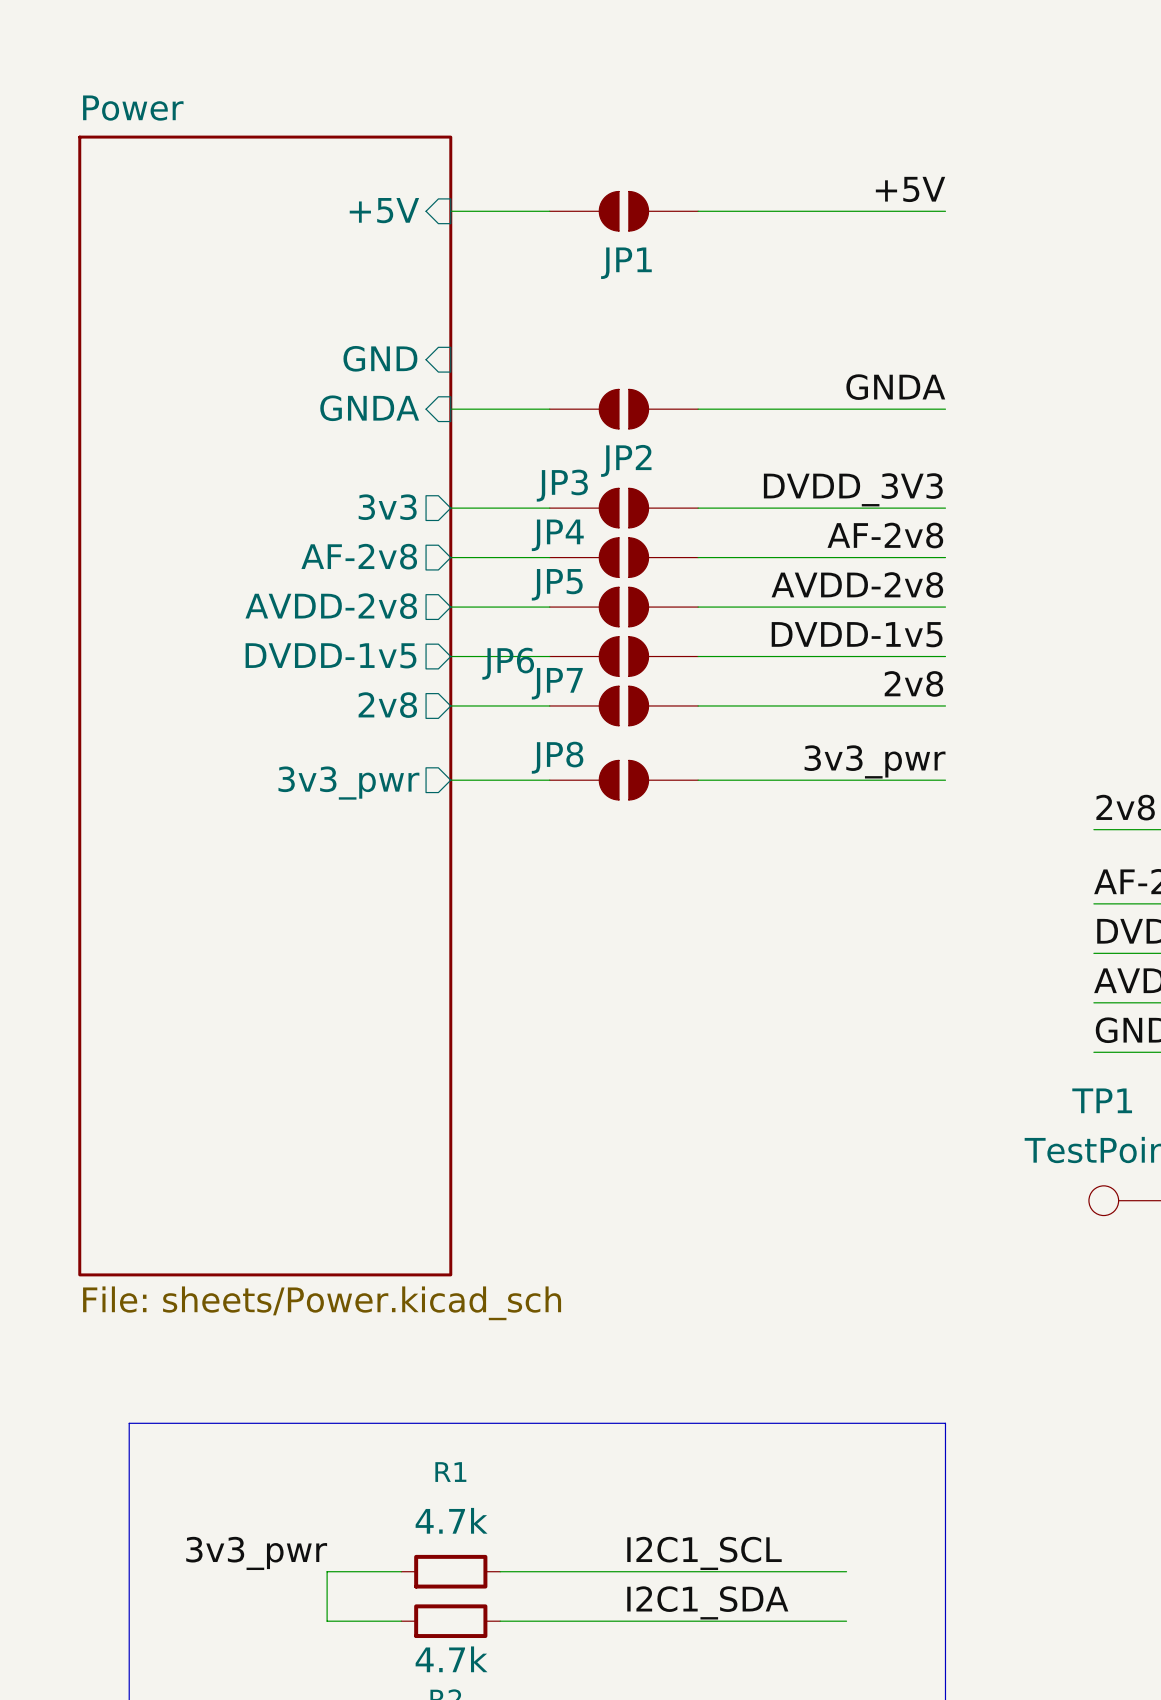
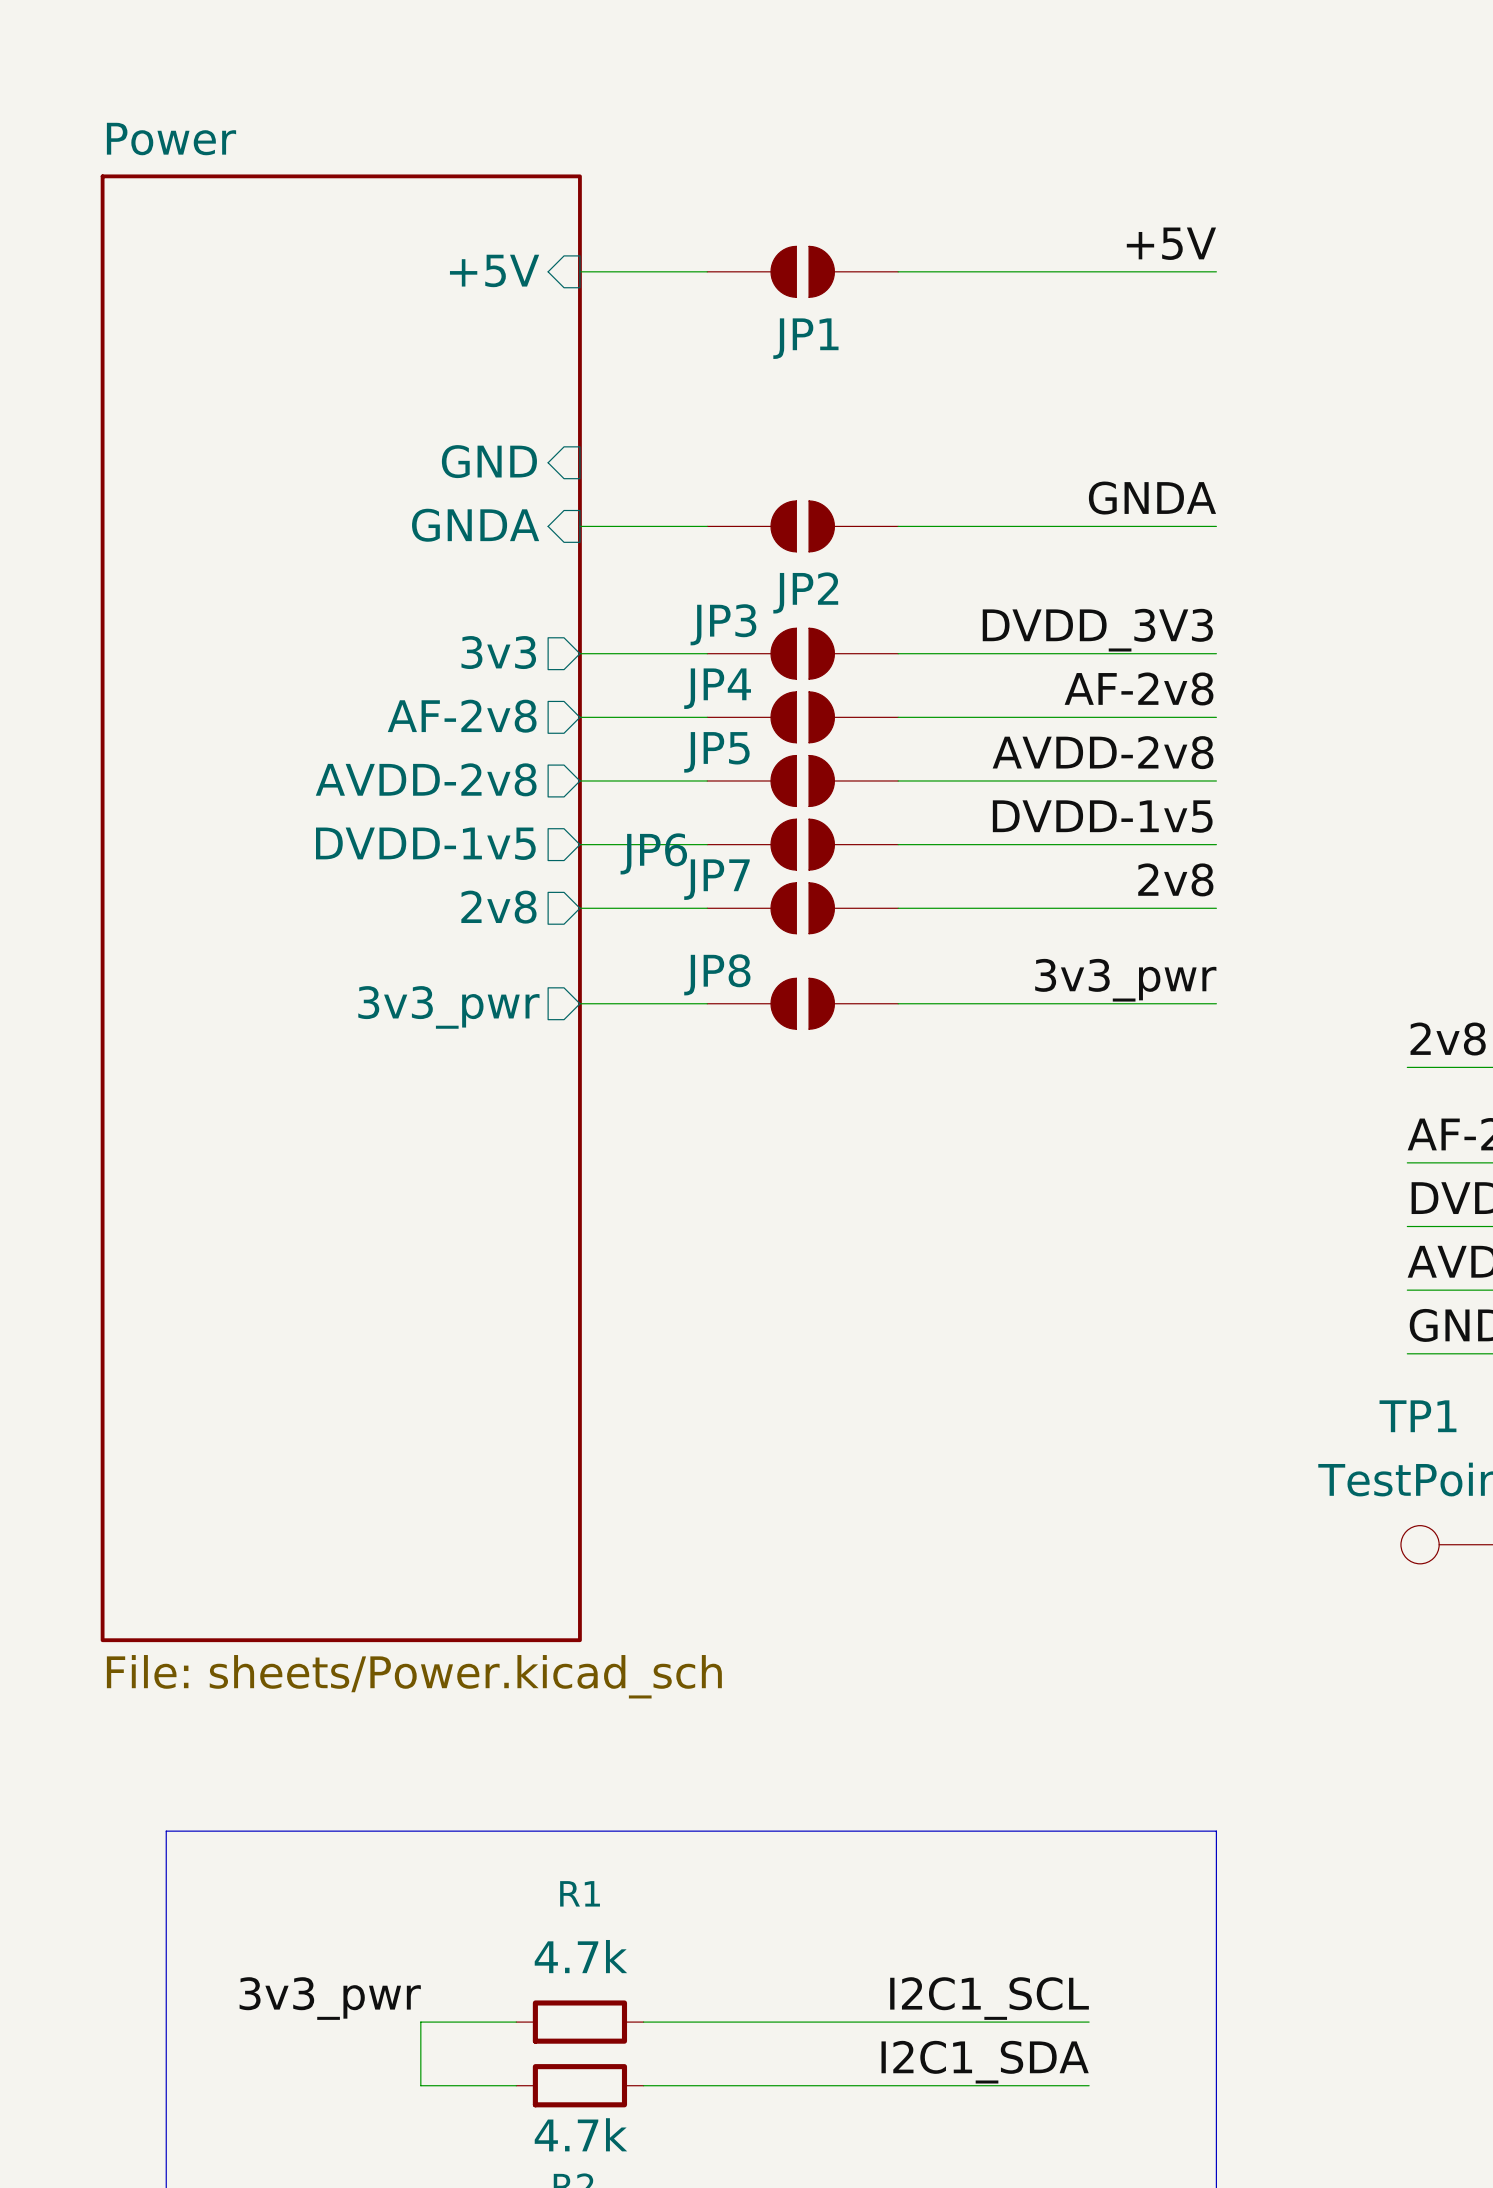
label position: I2C1_SCL (704, 1553) -> I2C1_SCL (989, 1998)
label position: I2C1_SDA (707, 1602) -> I2C1_SDA (985, 2062)

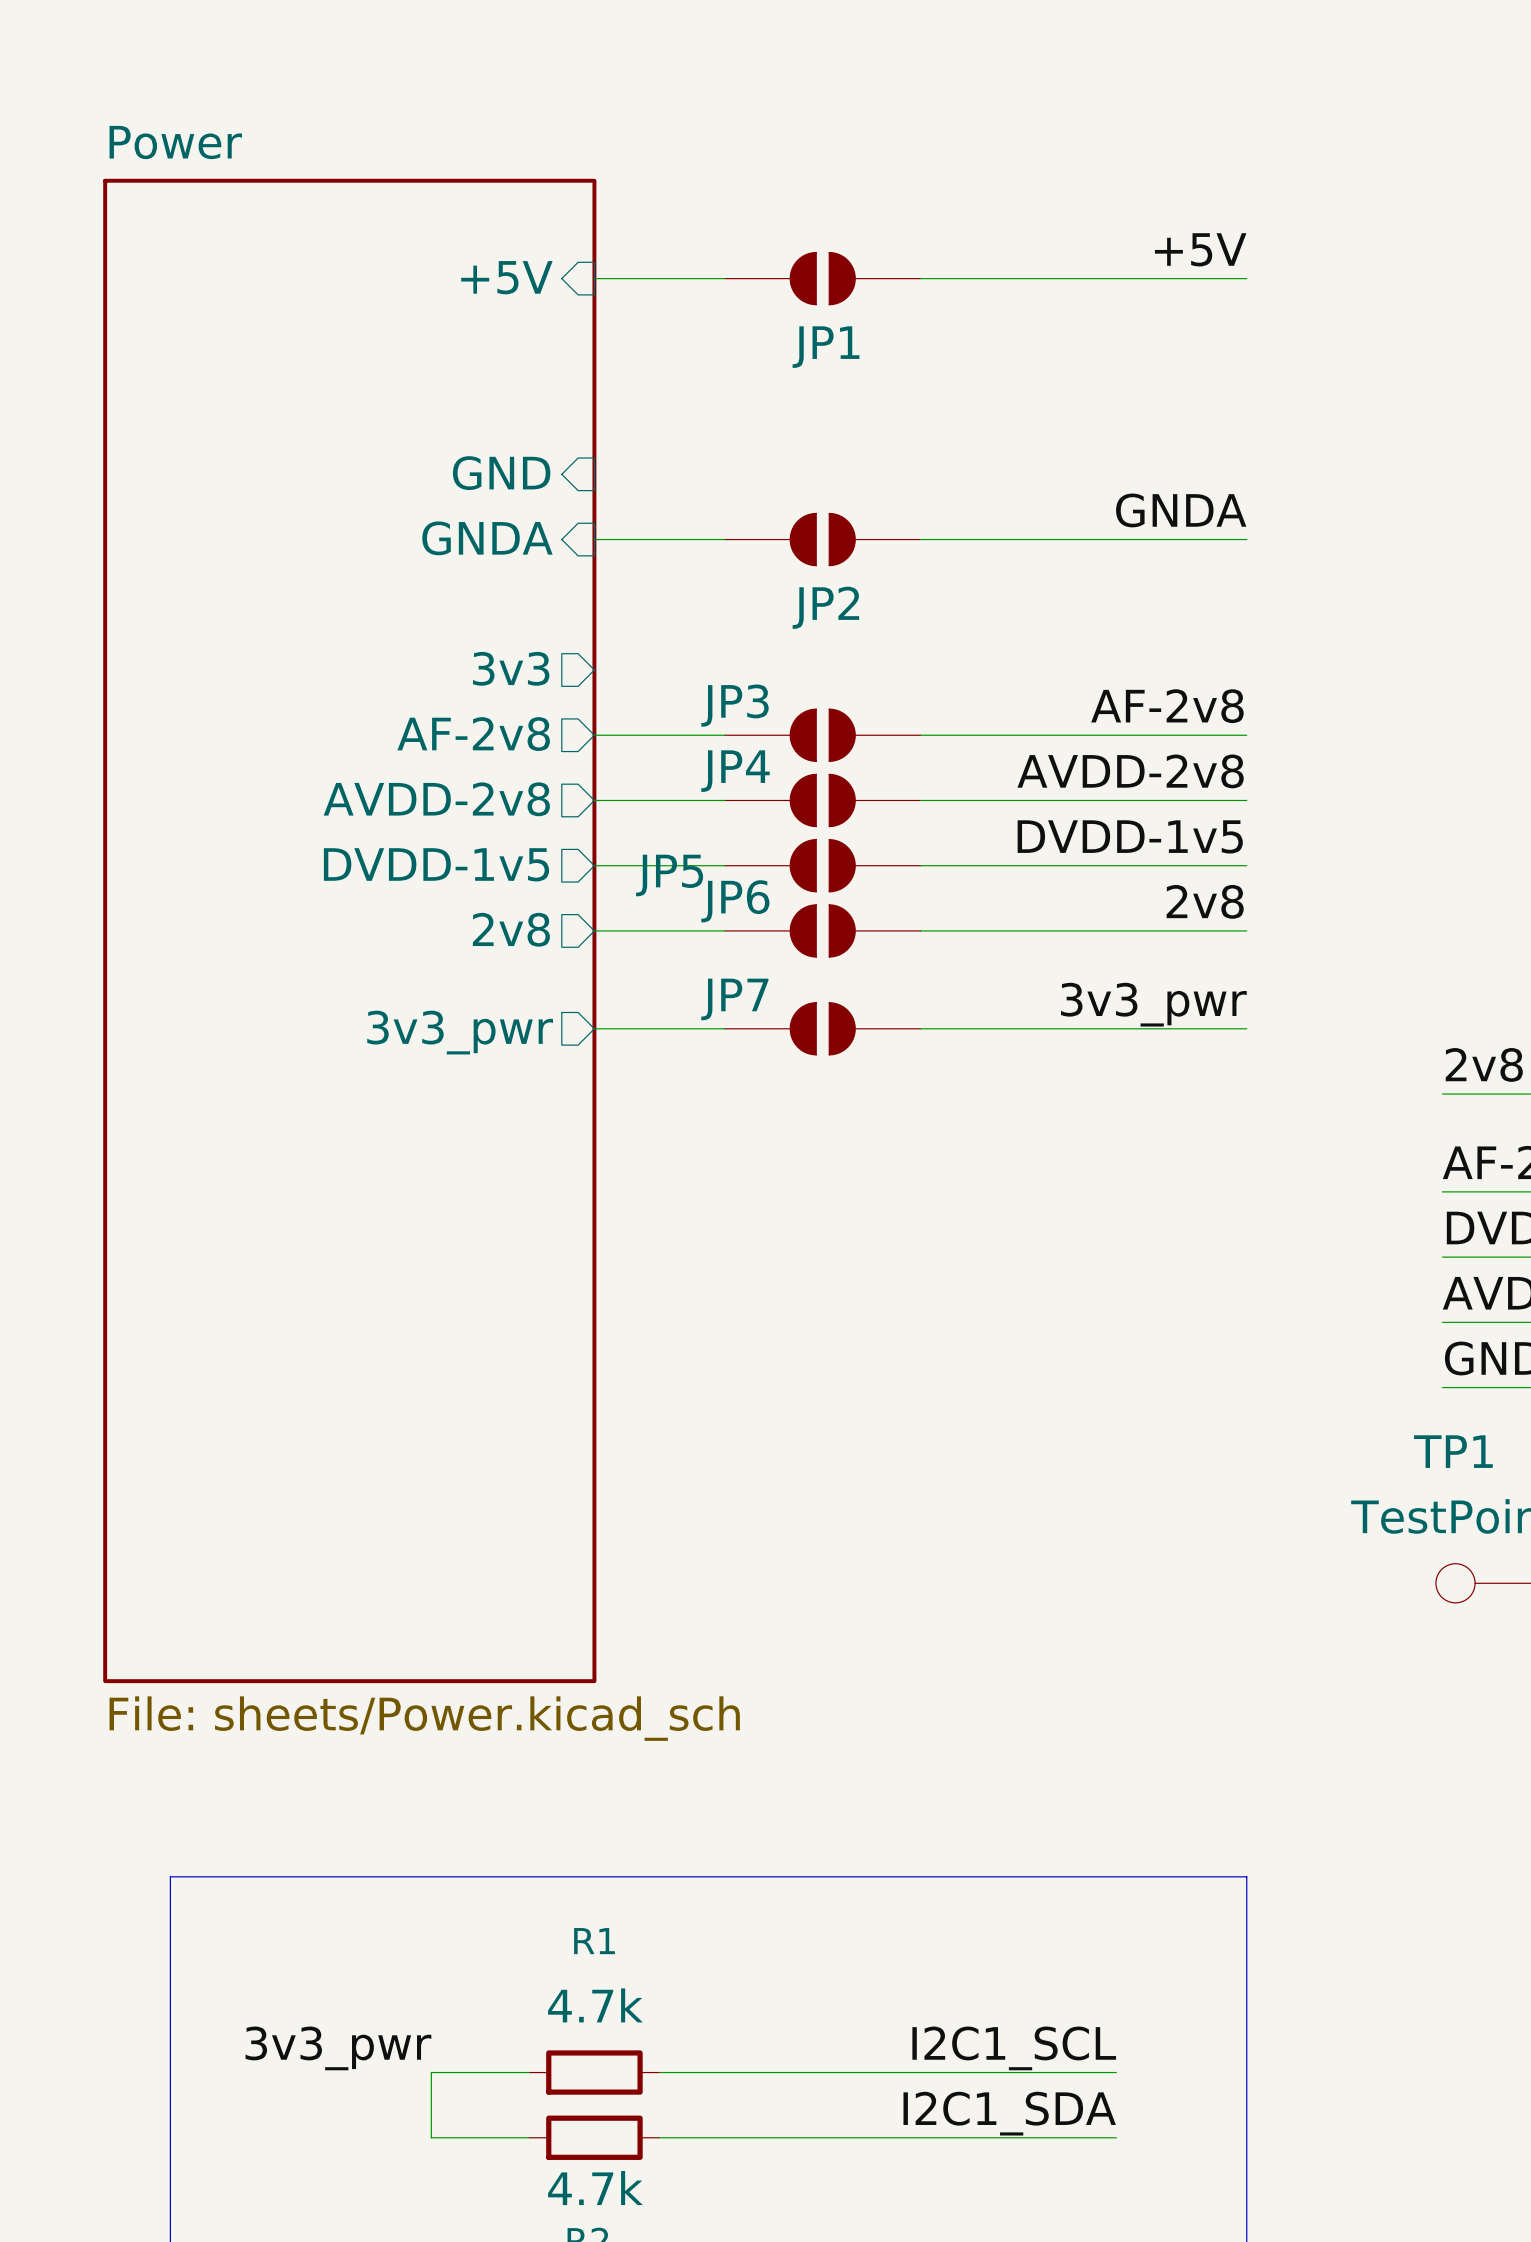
label: DVDD_3V3 (1097, 630) -> none
wire: (579, 653) (707, 653) -> none
JP3: (802, 653) -> none
wire: (898, 653) (1216, 653) -> none
JP4 name: JP4 (717, 688) -> JP3 (734, 705)
JP5 name: JP5 (716, 752) -> JP4 (735, 771)
JP6 name: JP6 (653, 853) -> JP5 (669, 875)
JP7 name: JP7 (716, 879) -> JP6 (735, 901)
JP8 name: JP8 (717, 974) -> JP7 (734, 999)

